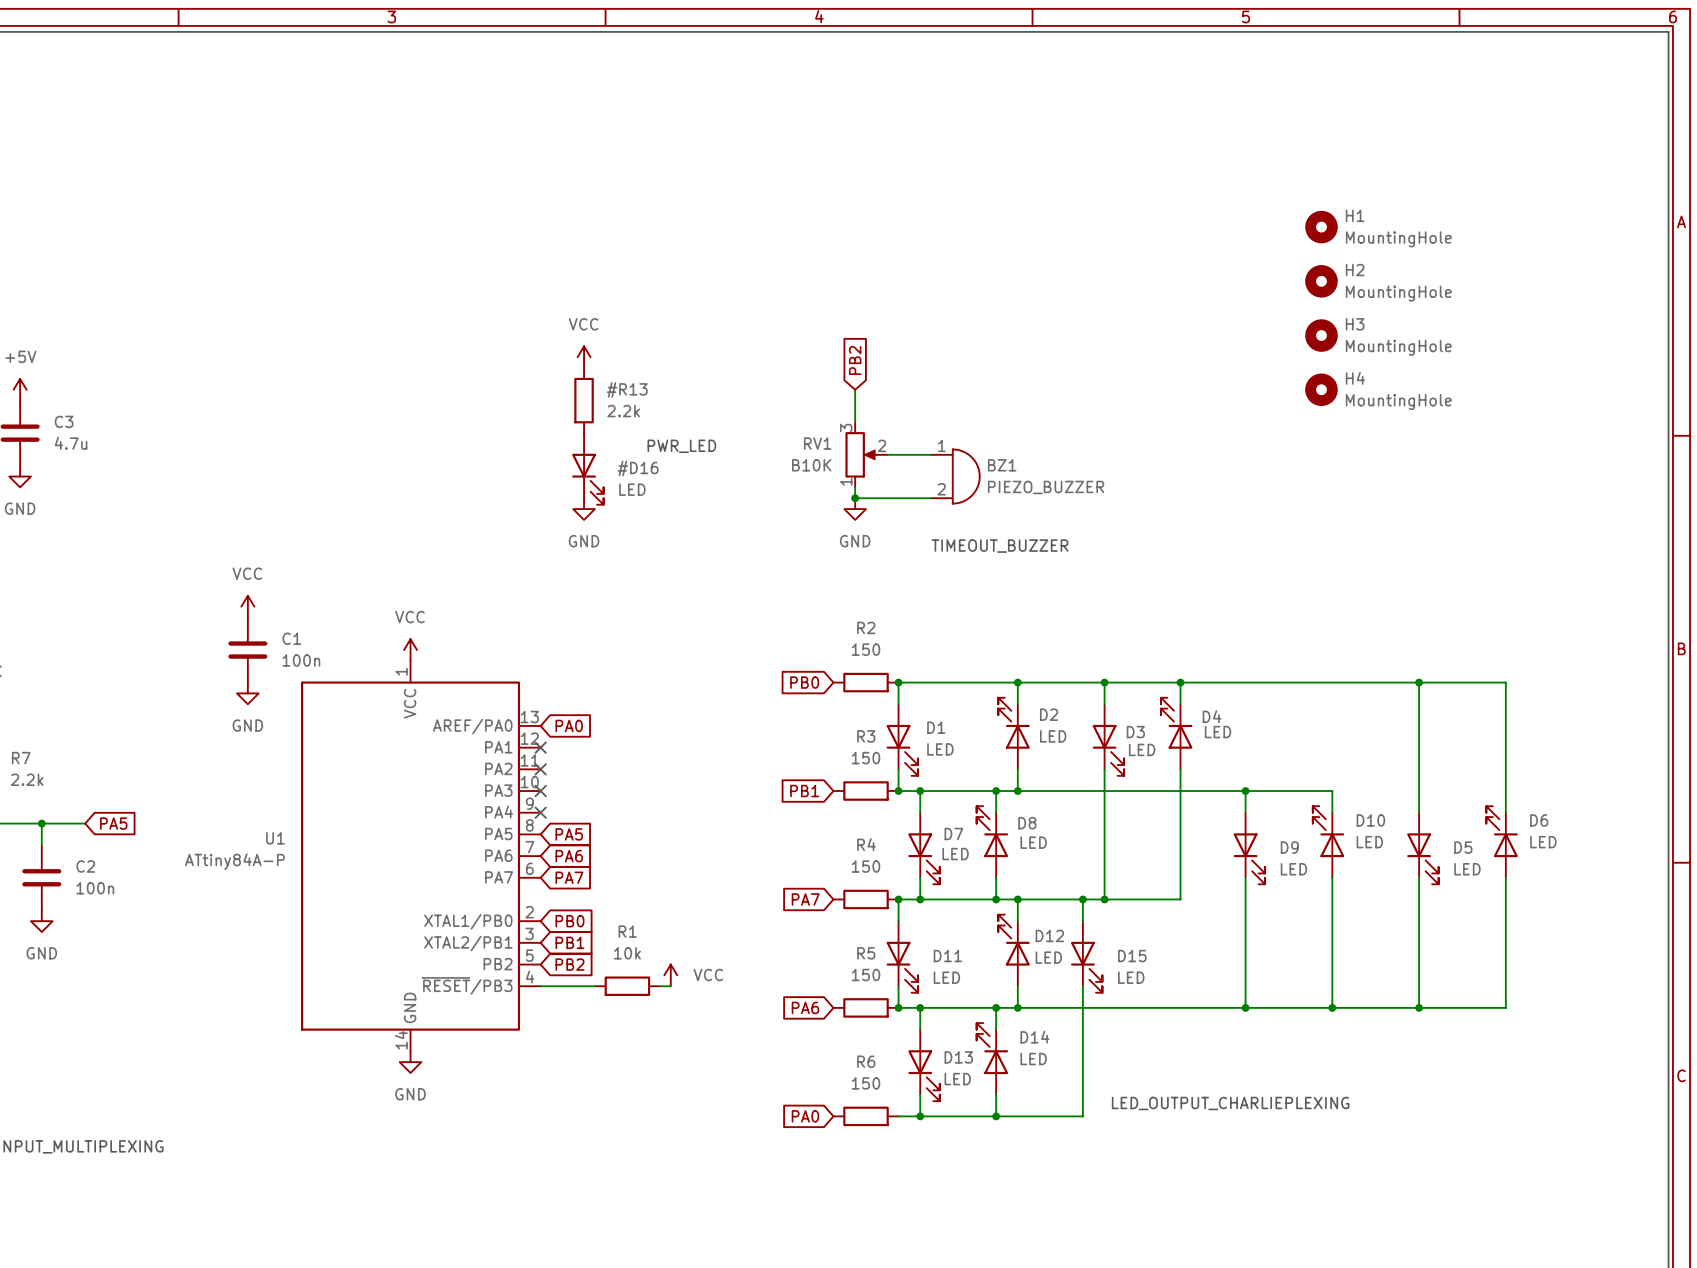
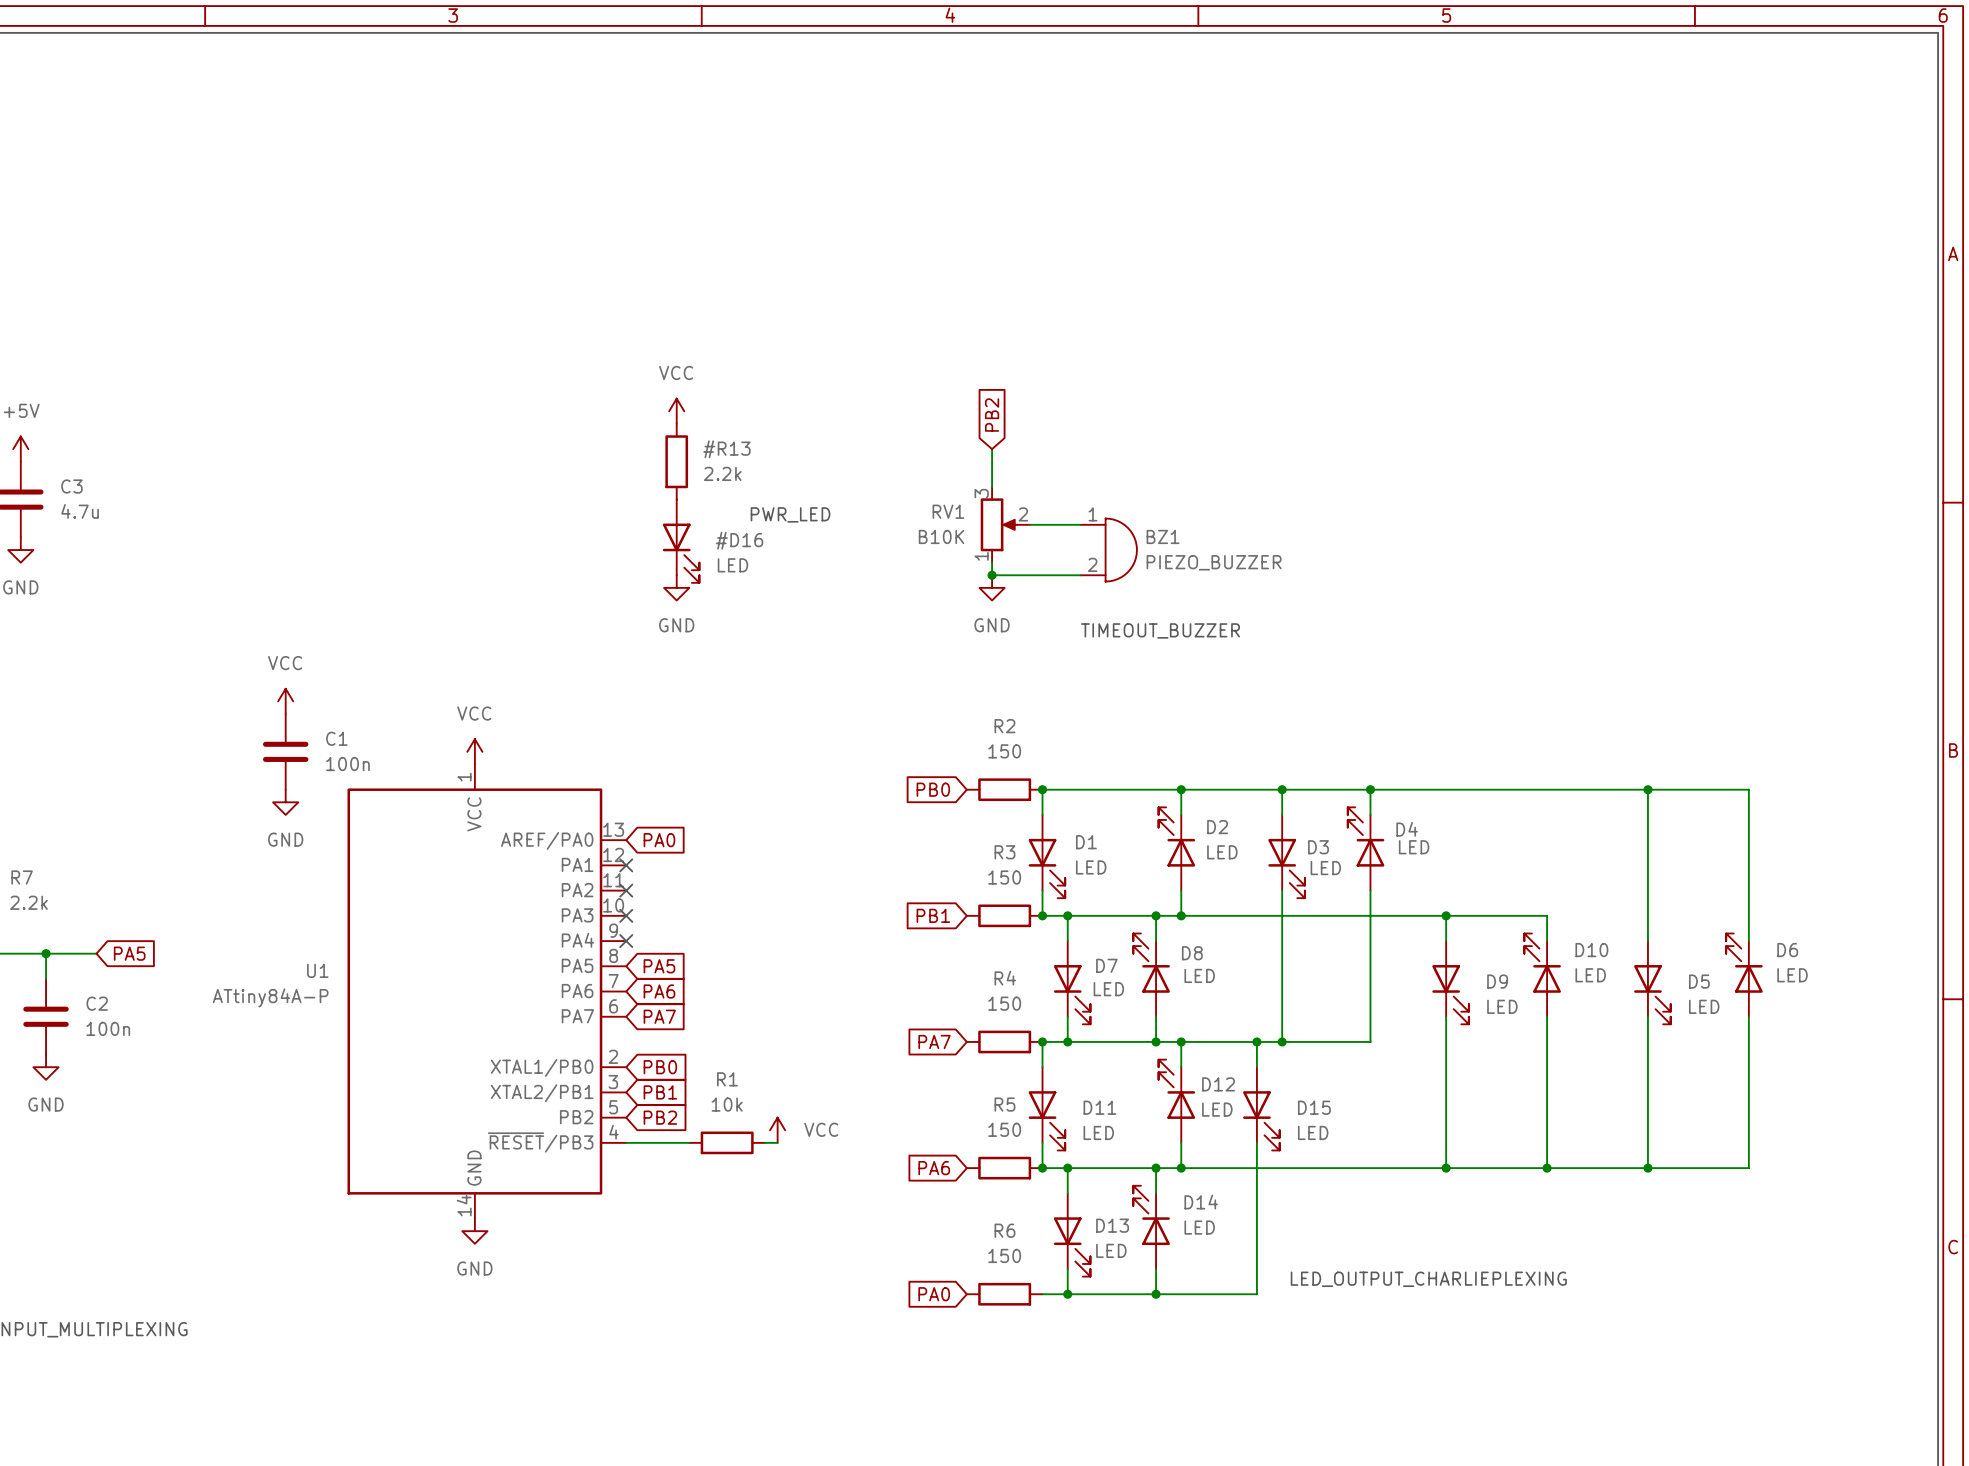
H1: MountingHole (1321, 227) -> none
H2: MountingHole (1321, 281) -> none
H3: MountingHole (1321, 335) -> none
H4: MountingHole (1321, 389) -> none

